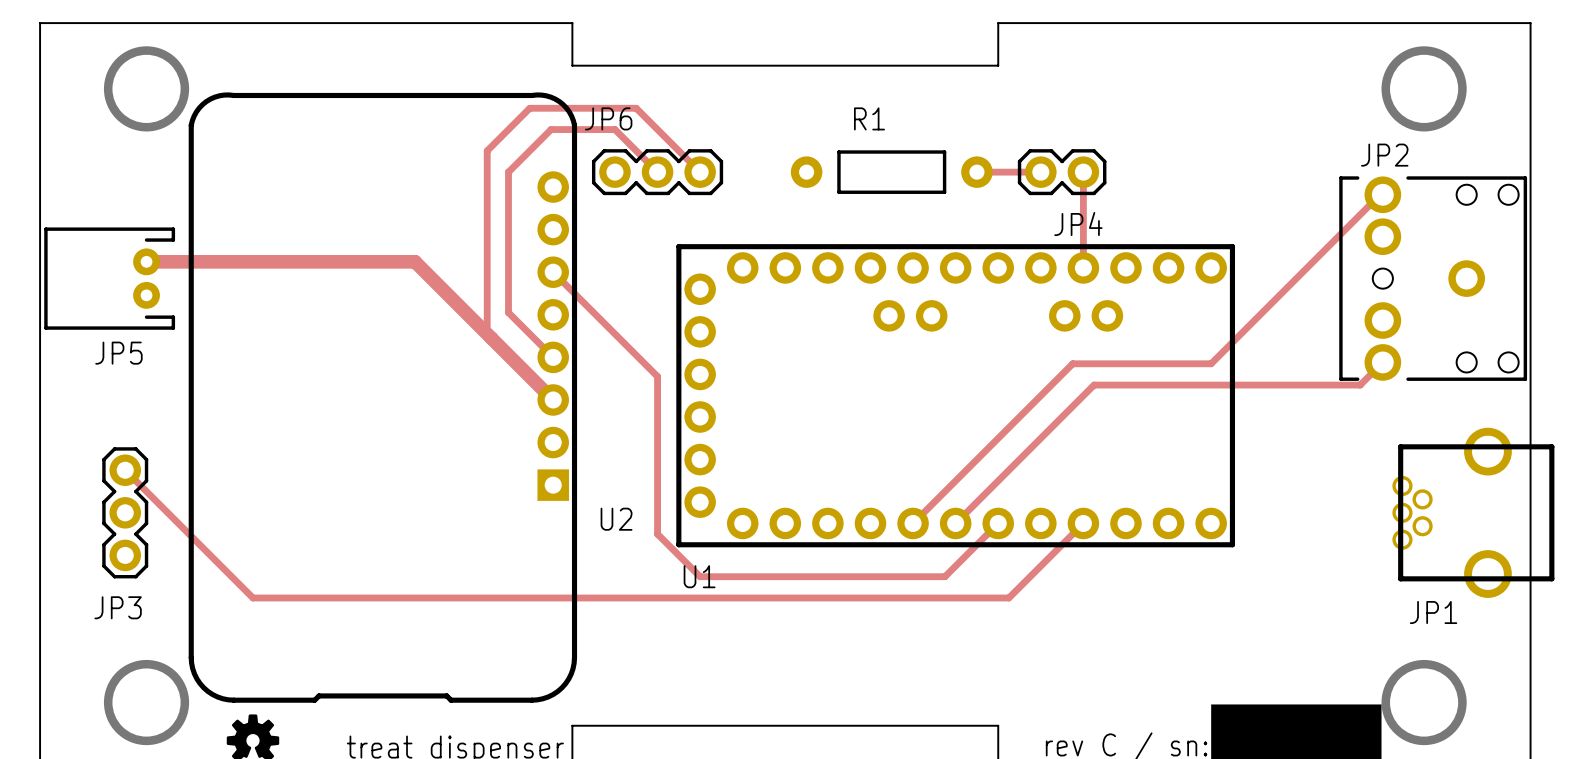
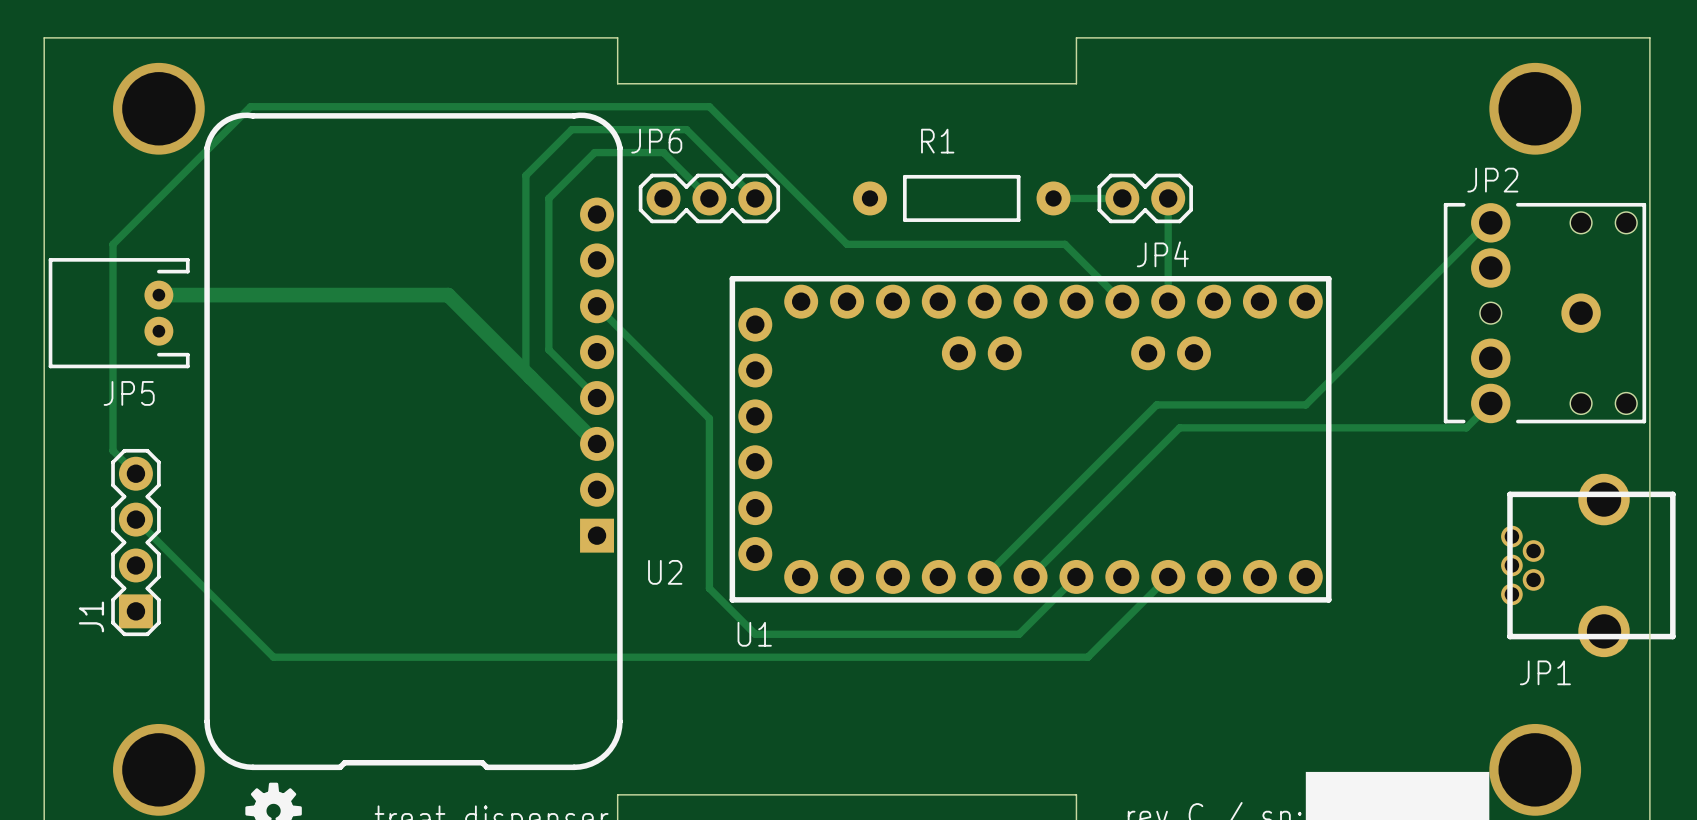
track: none -> (1122, 301) (1064, 244) (847, 244) (709, 106) (250, 106) (113, 244) (113, 450) (135, 473)
J1: none -> (135, 542)
JP3: (125, 512) -> none

